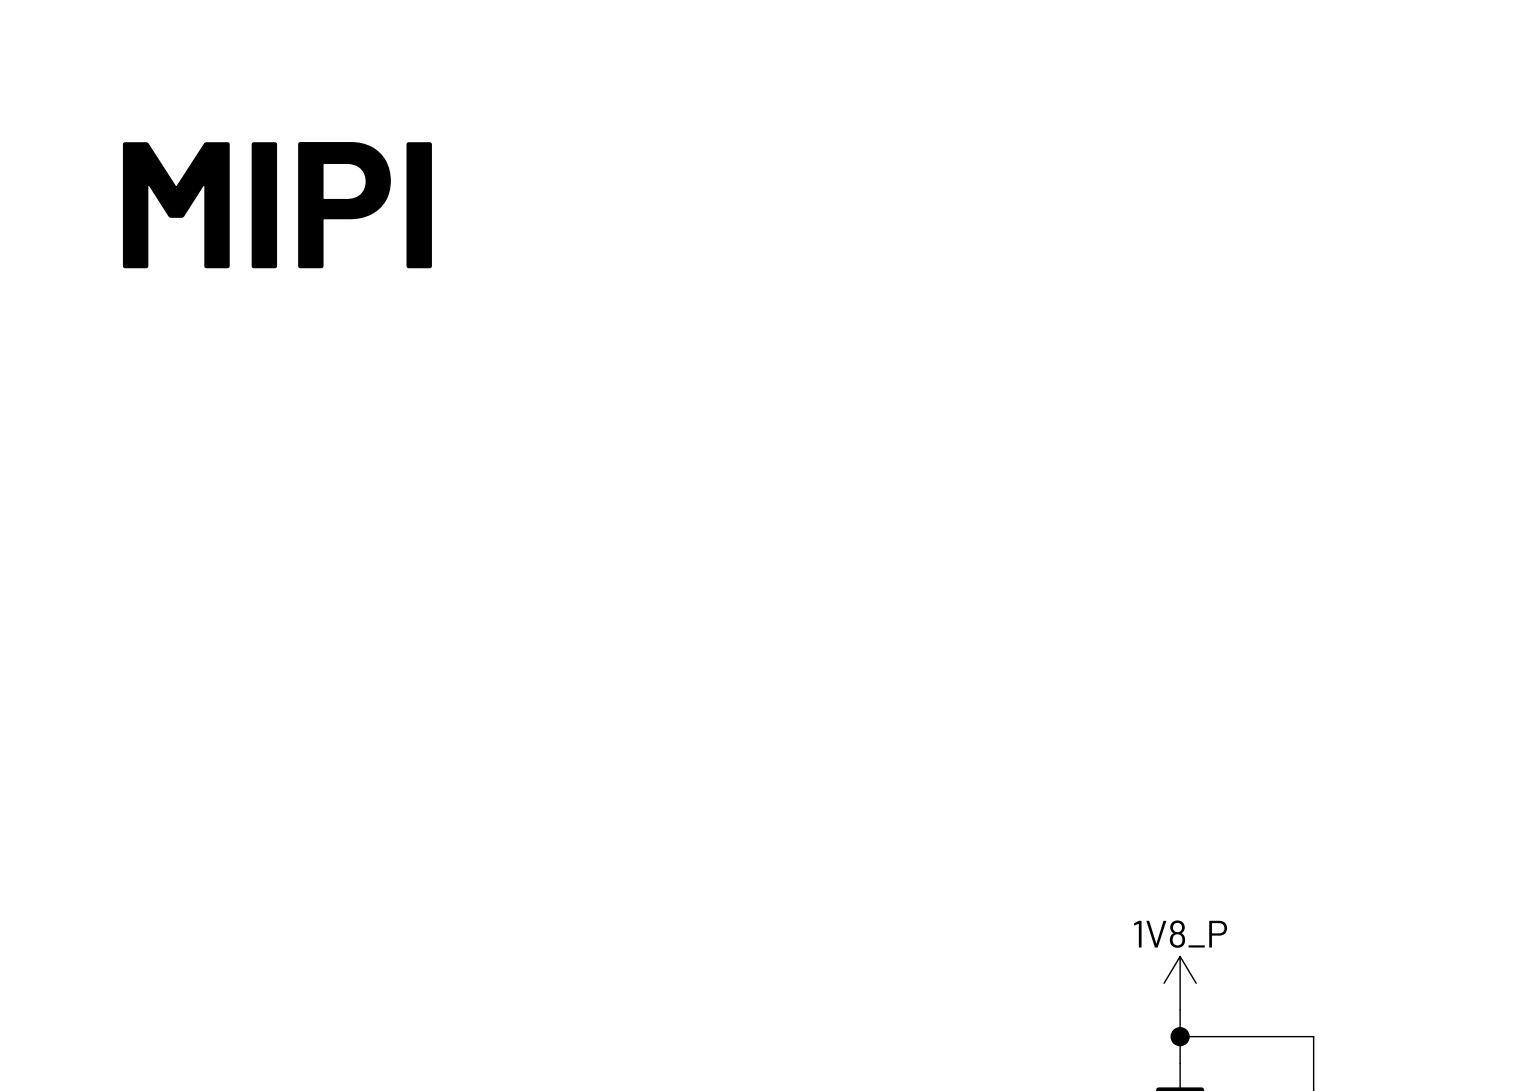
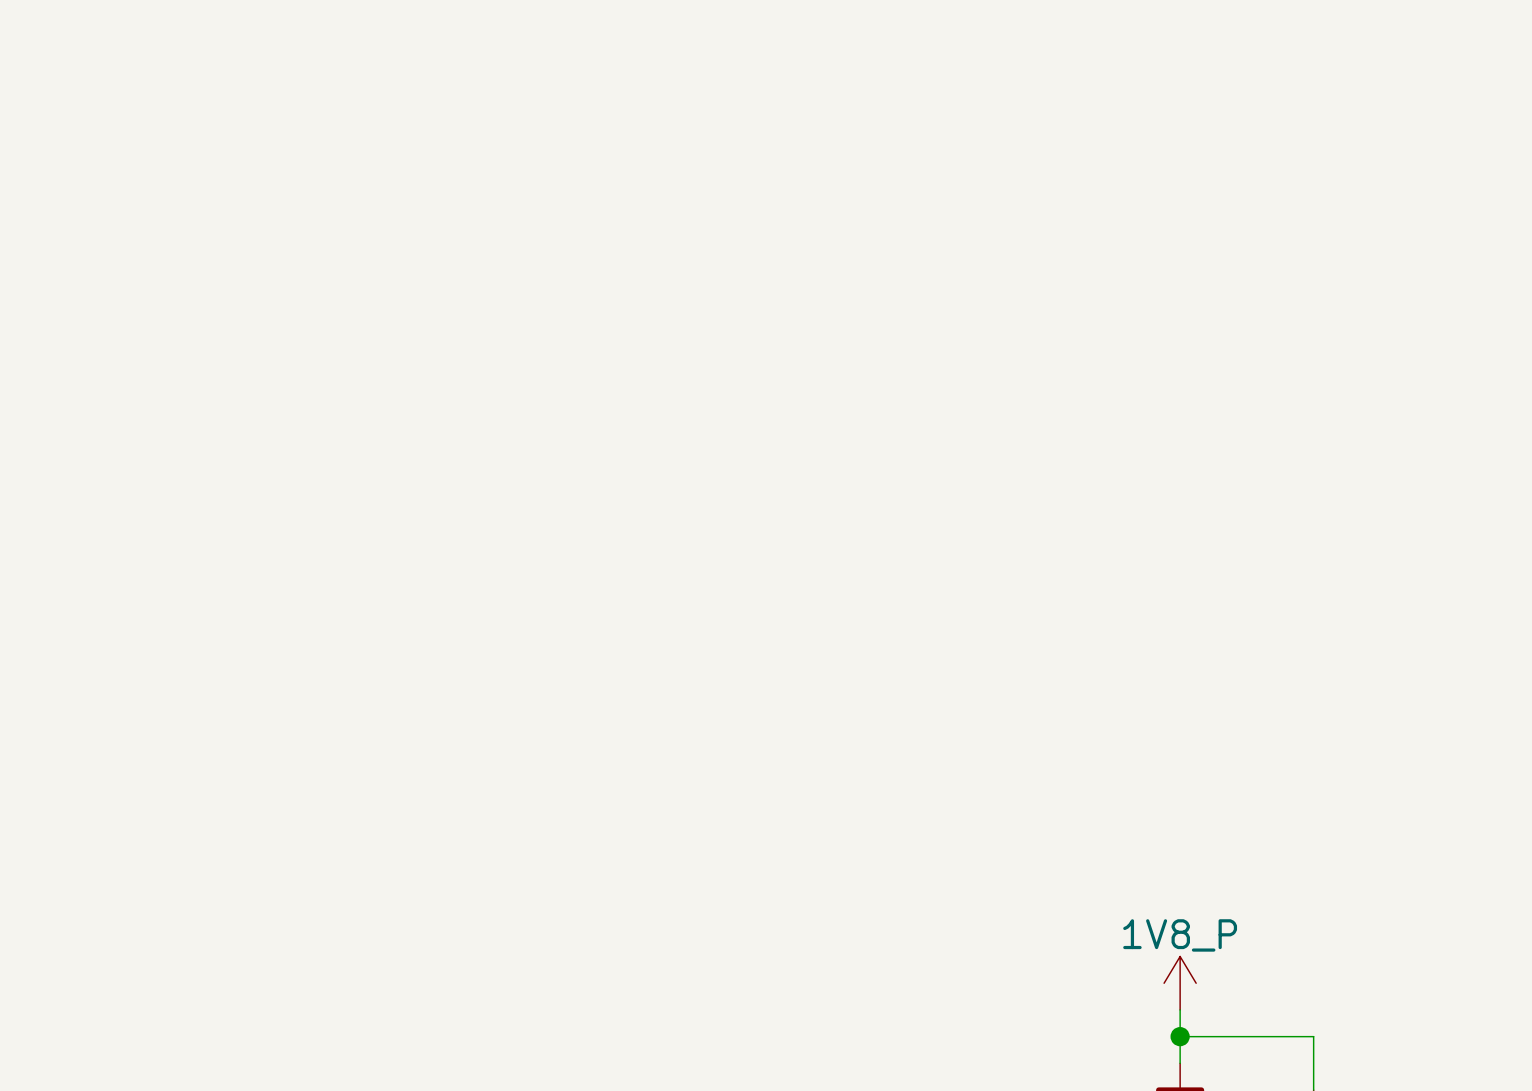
text: MIPI (277, 205) -> none

